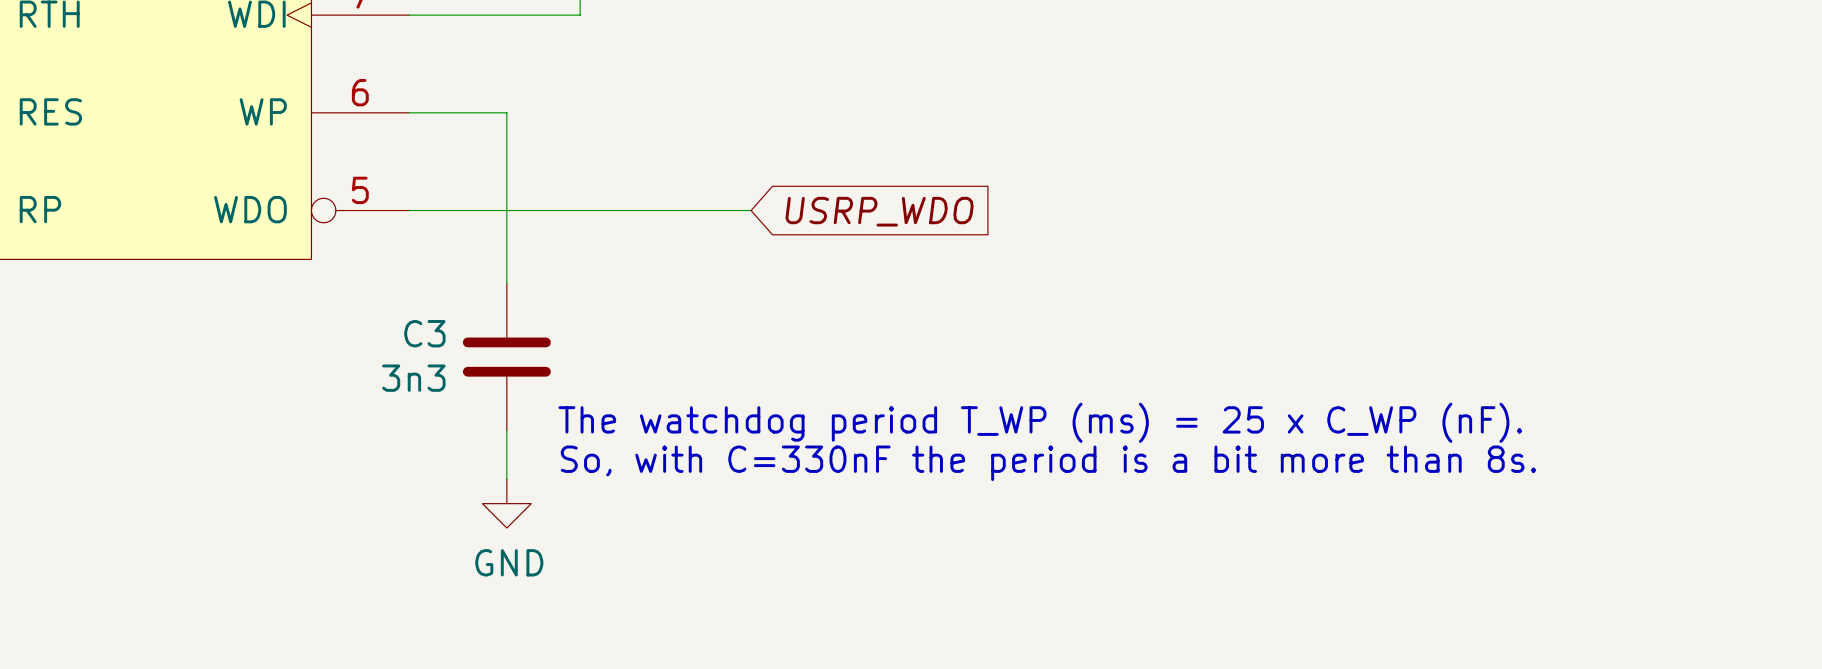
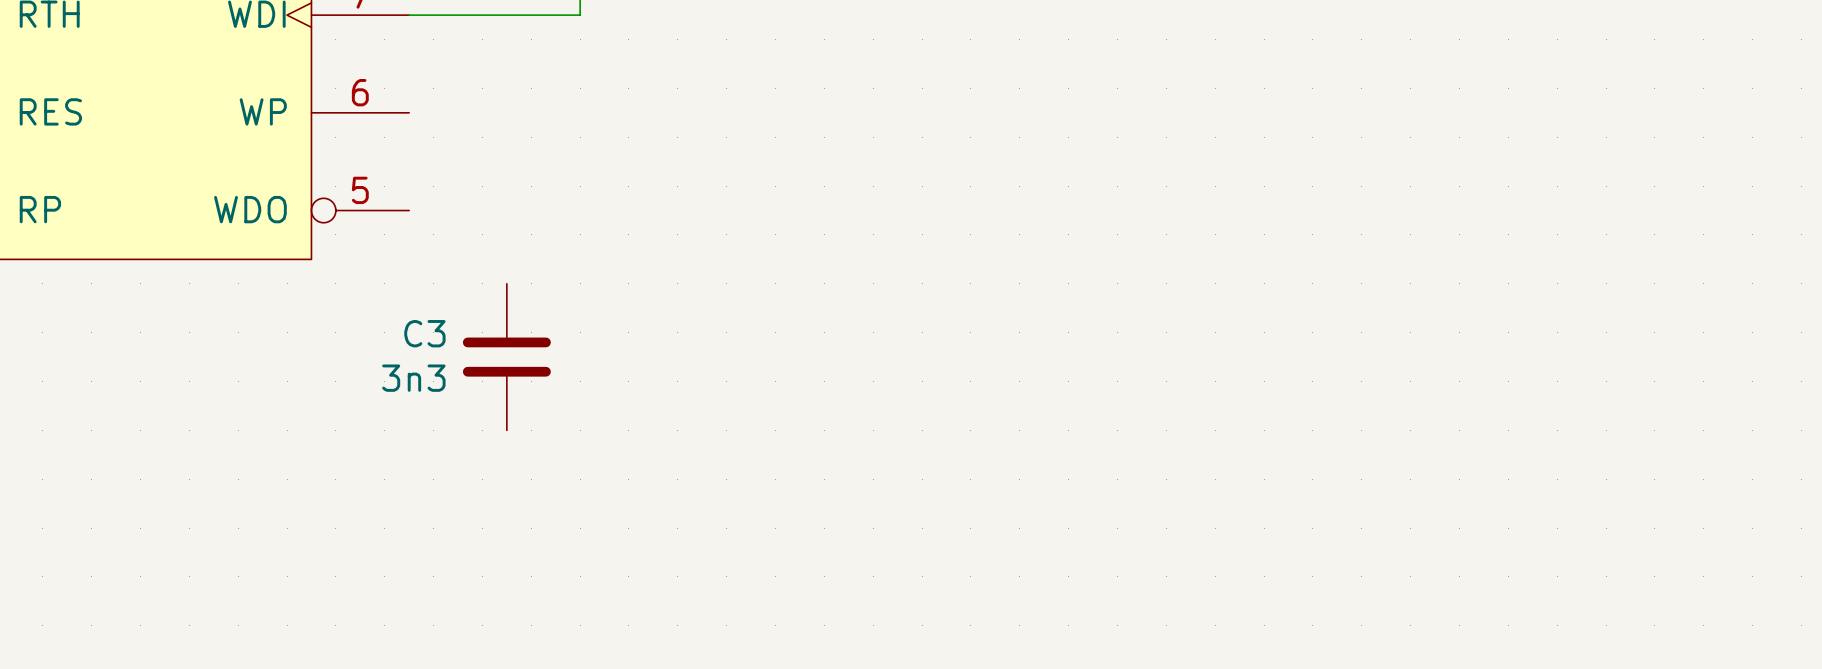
wire: (409, 112) (506, 112) (506, 283) -> none
wire: (409, 210) (751, 210) -> none
global label: USRP_WDO (879, 211) -> none
text: The watchdog period T_WP (ms) = 25 x C_WP (nF). (1040, 422) -> none
wire: (506, 430) (506, 479) -> none
text: So, with C=330nF the period is a bit more than 8s. (1048, 463) -> none
power symbol: GND (506, 503) -> none

